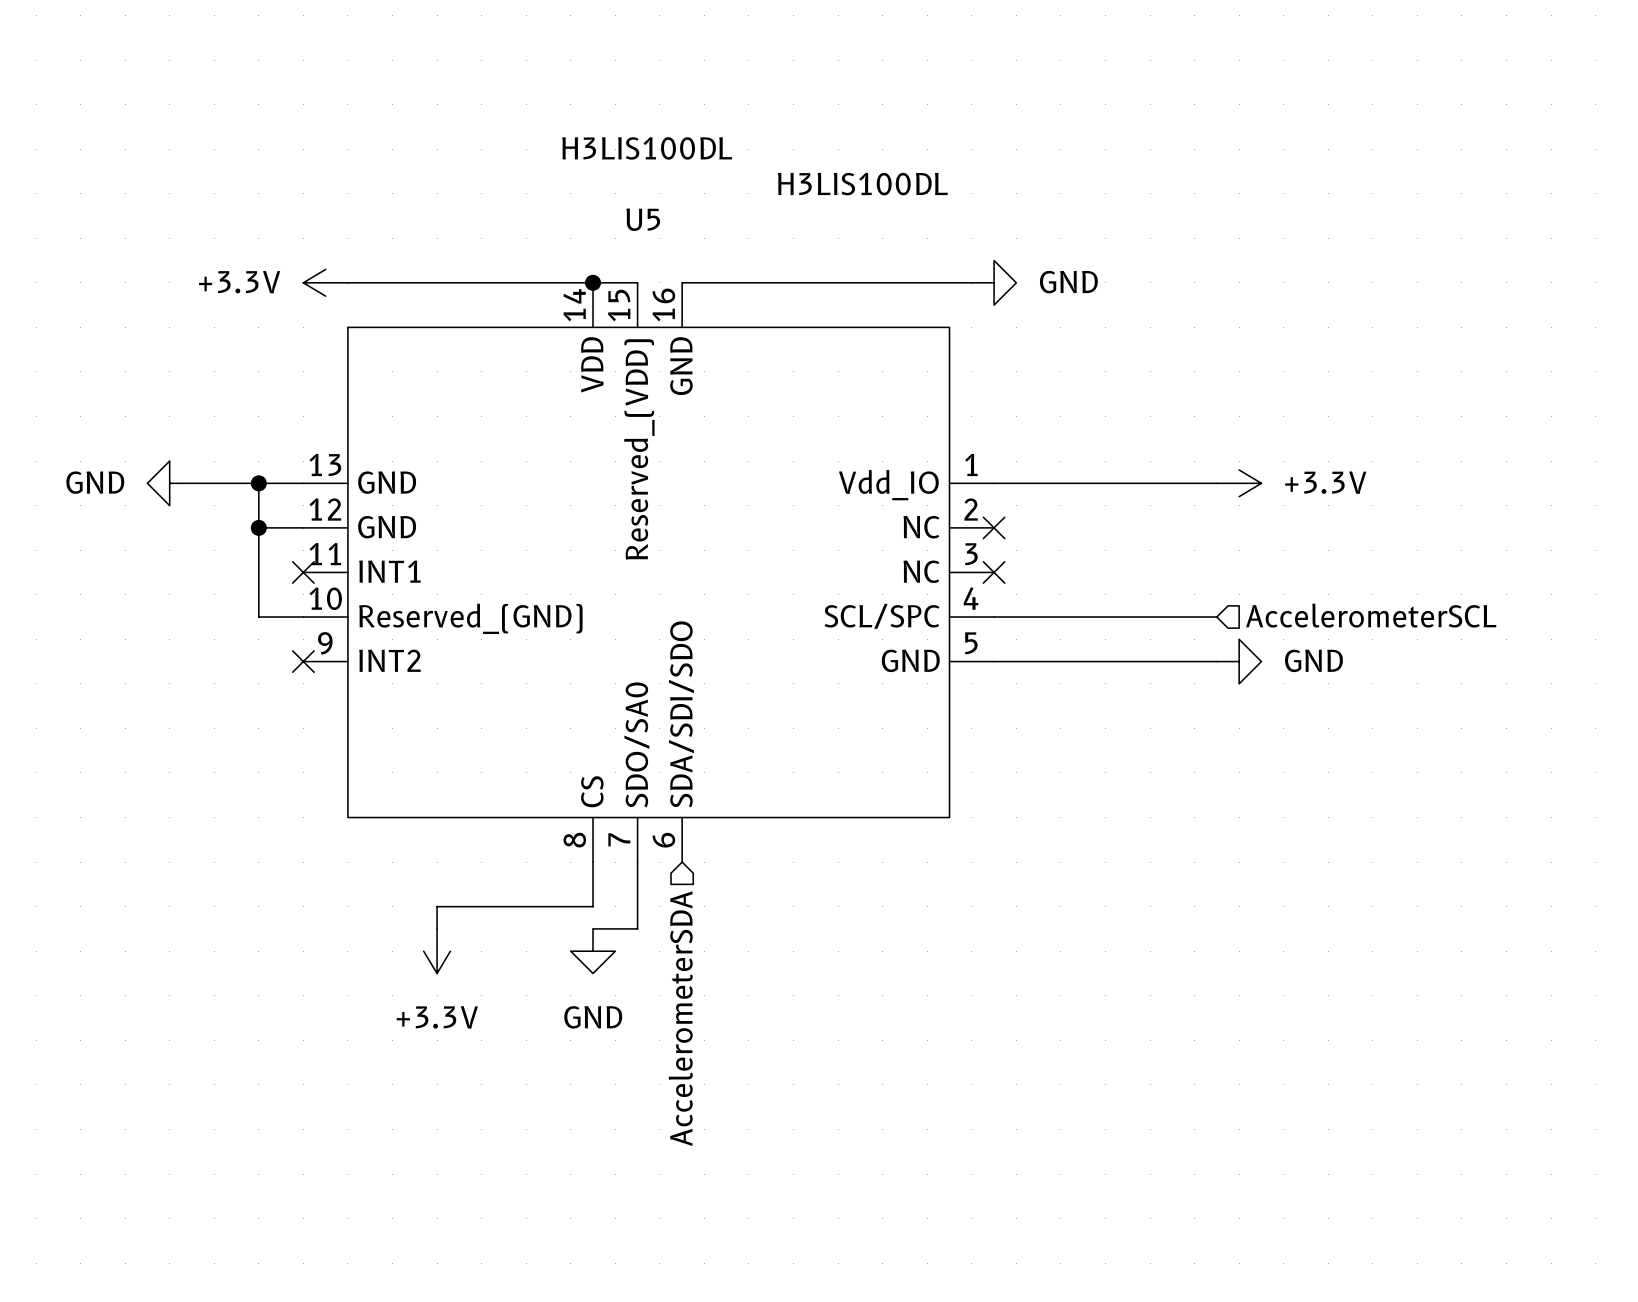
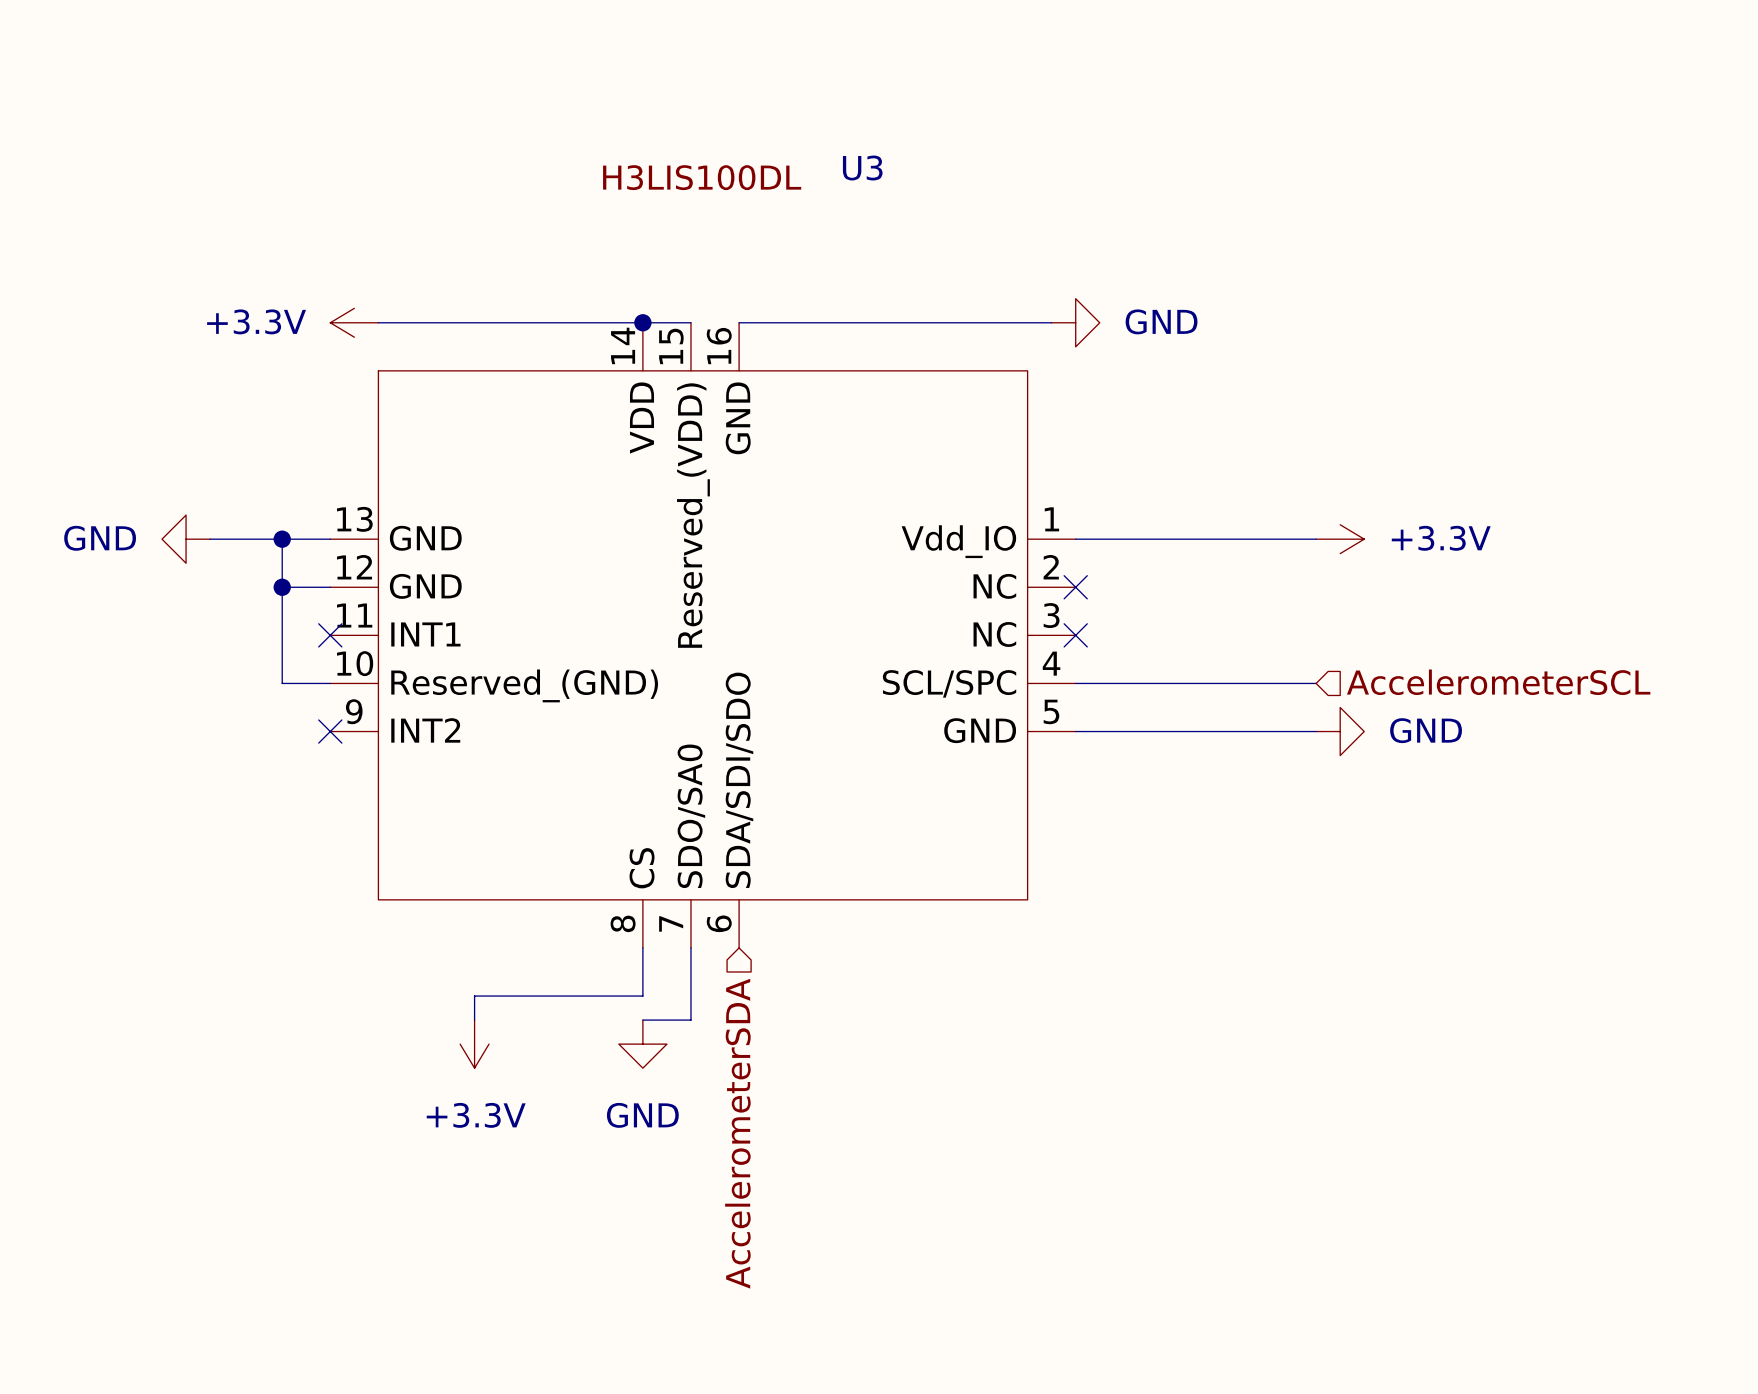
U5 value: H3LIS100DL (862, 184) -> none
U5 name: U5 (643, 219) -> U3 (862, 168)

